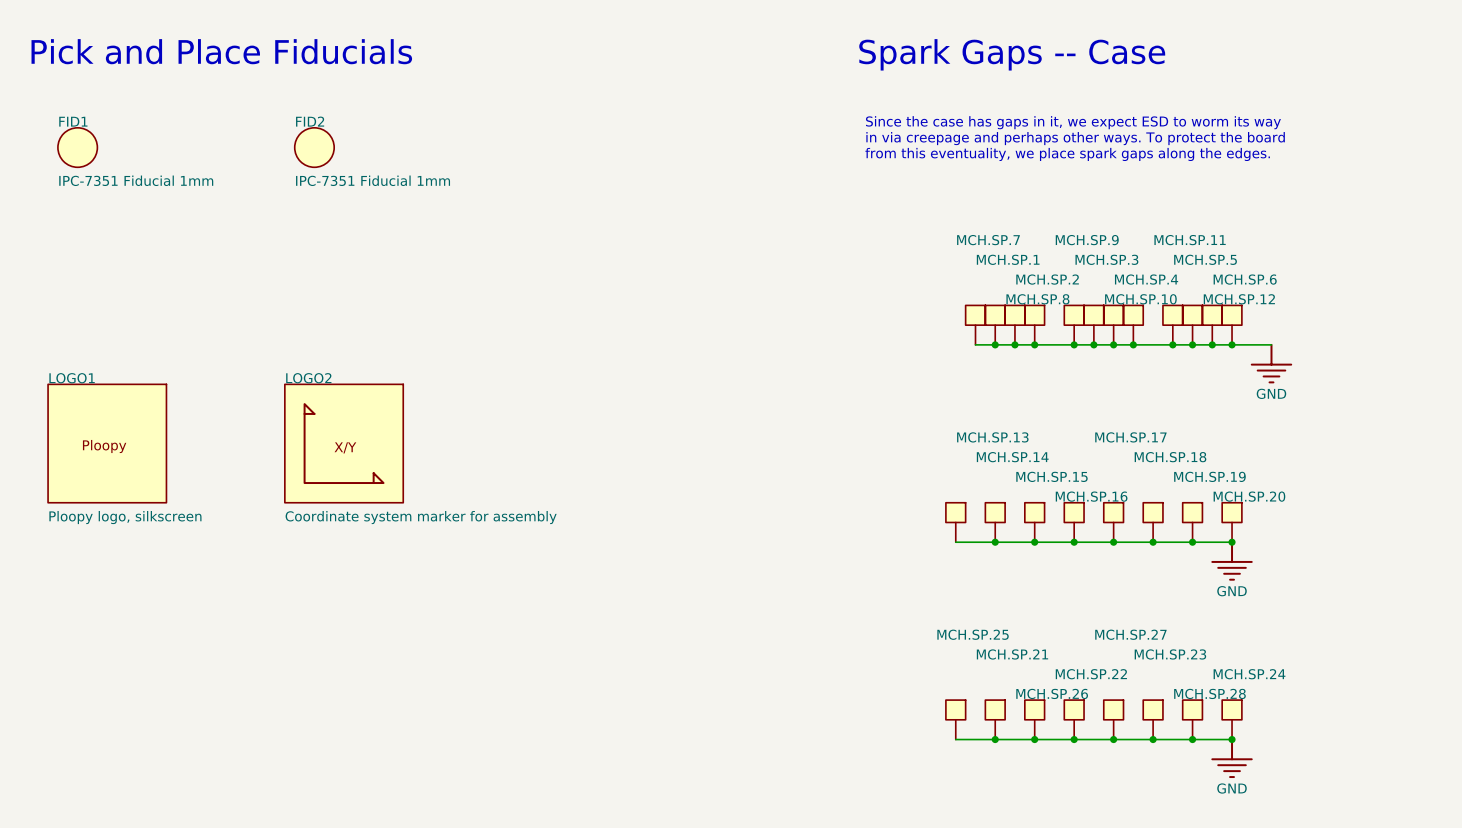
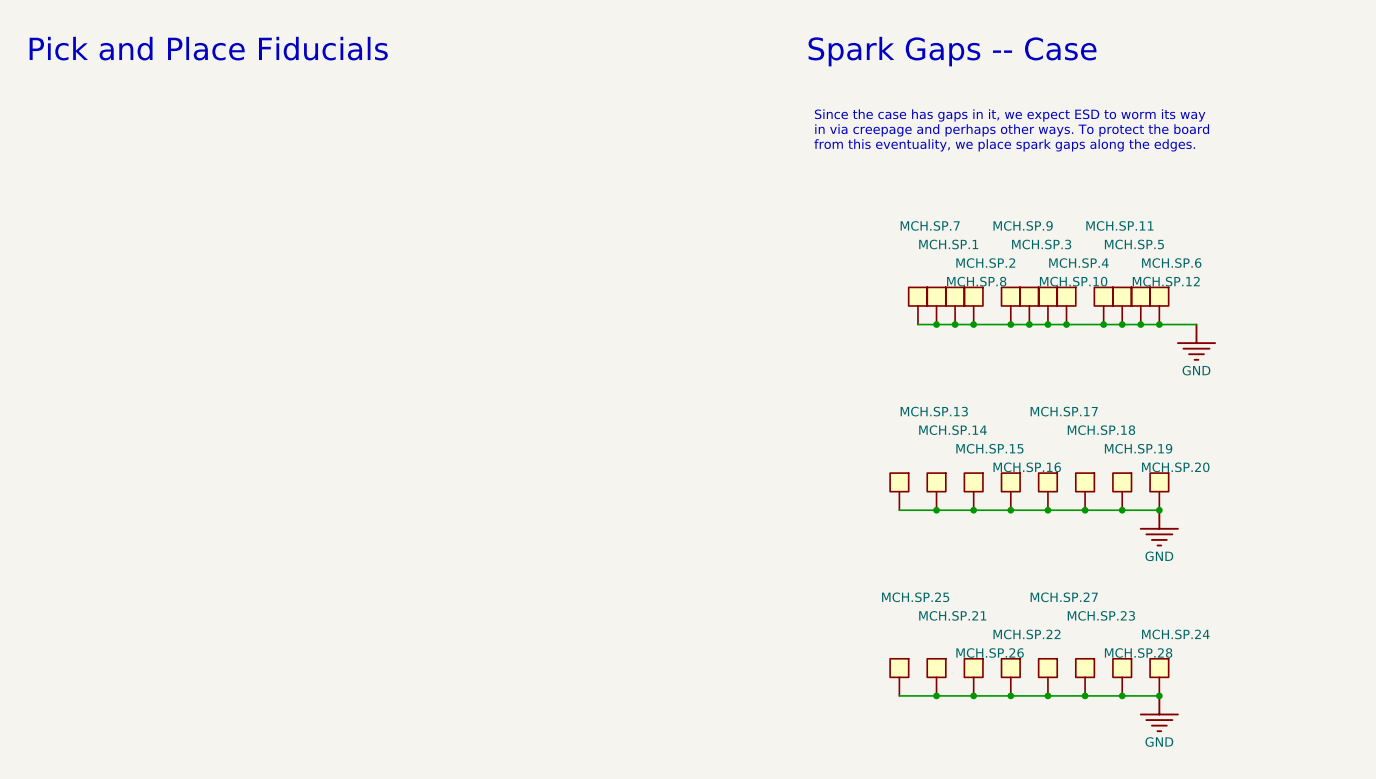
FID1: IPC-7351 Fiducial 1mm (77, 147) -> none
FID2: IPC-7351 Fiducial 1mm (314, 147) -> none
LOGO1: Ploopy logo, silkscreen (107, 443) -> none
LOGO2: Coordinate system marker for assembly (344, 443) -> none

